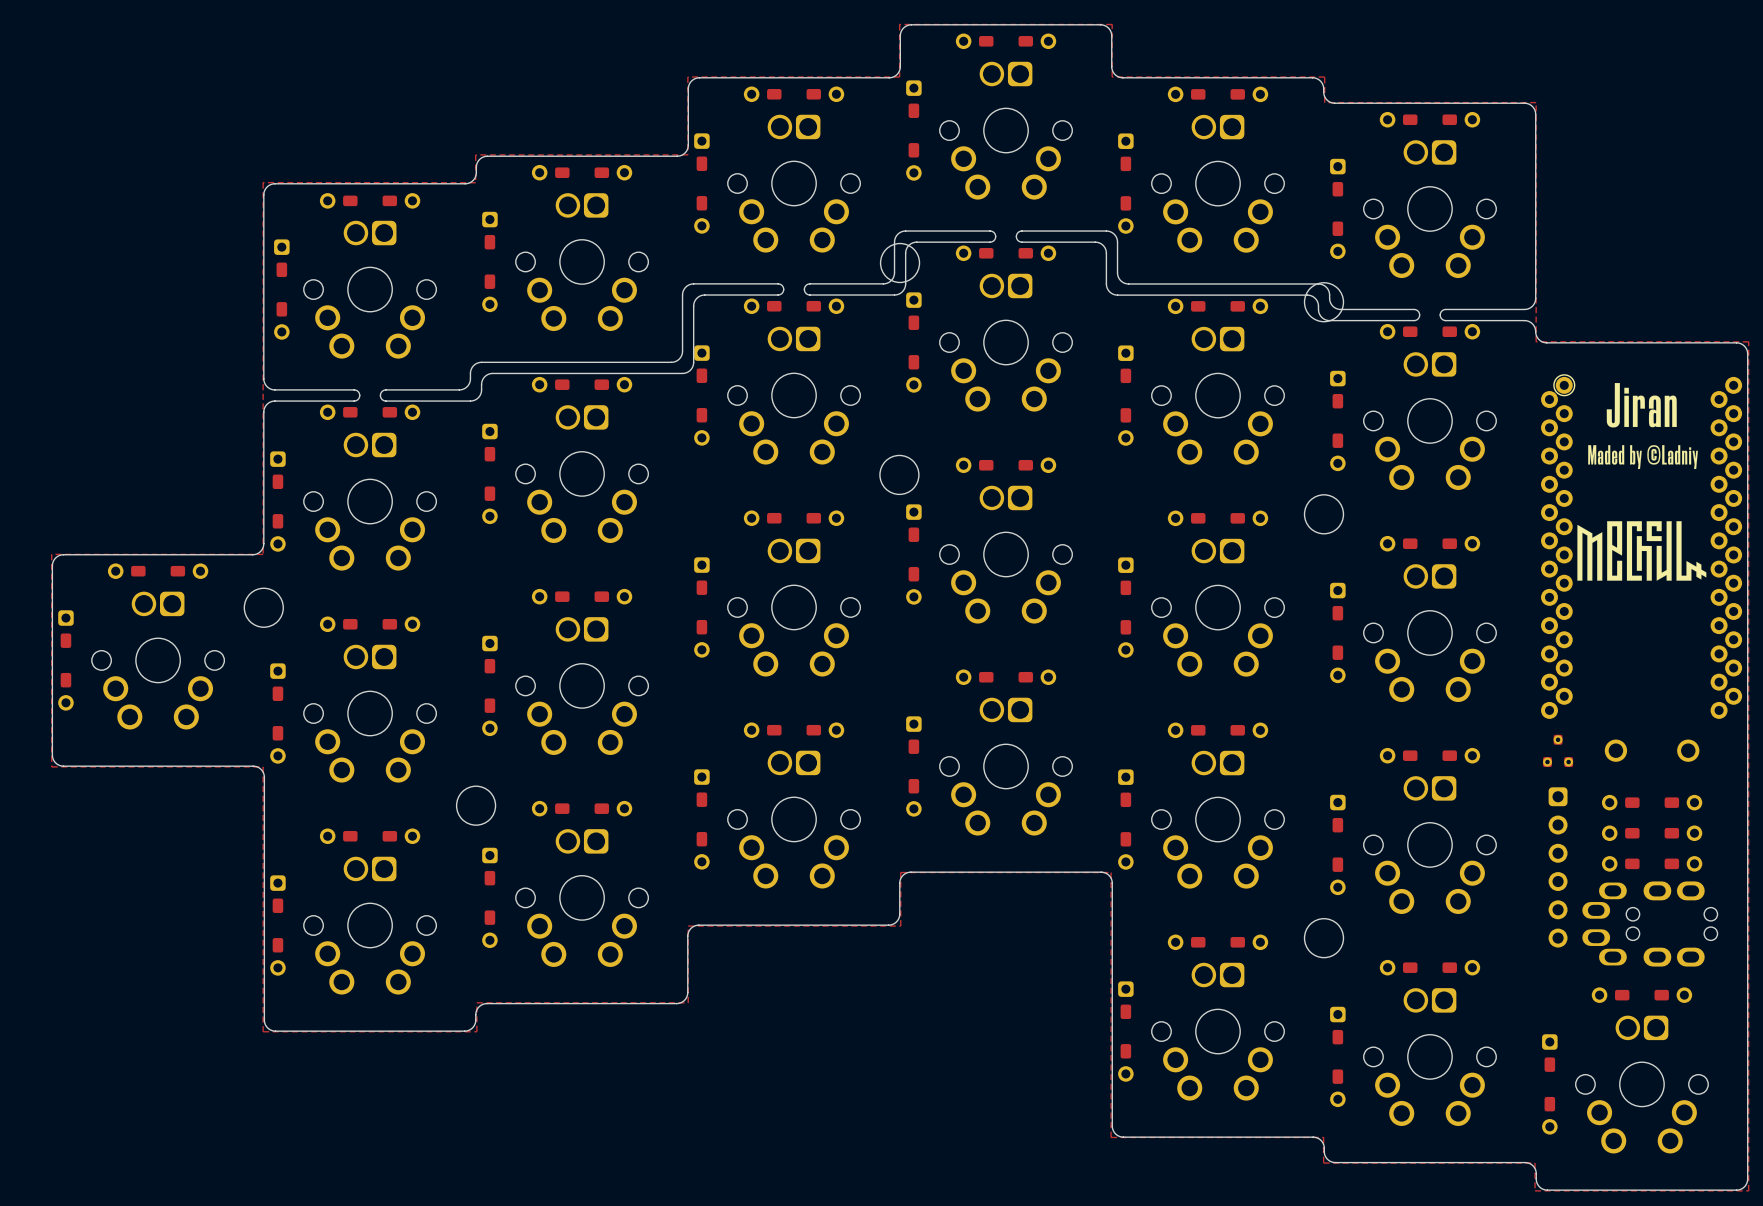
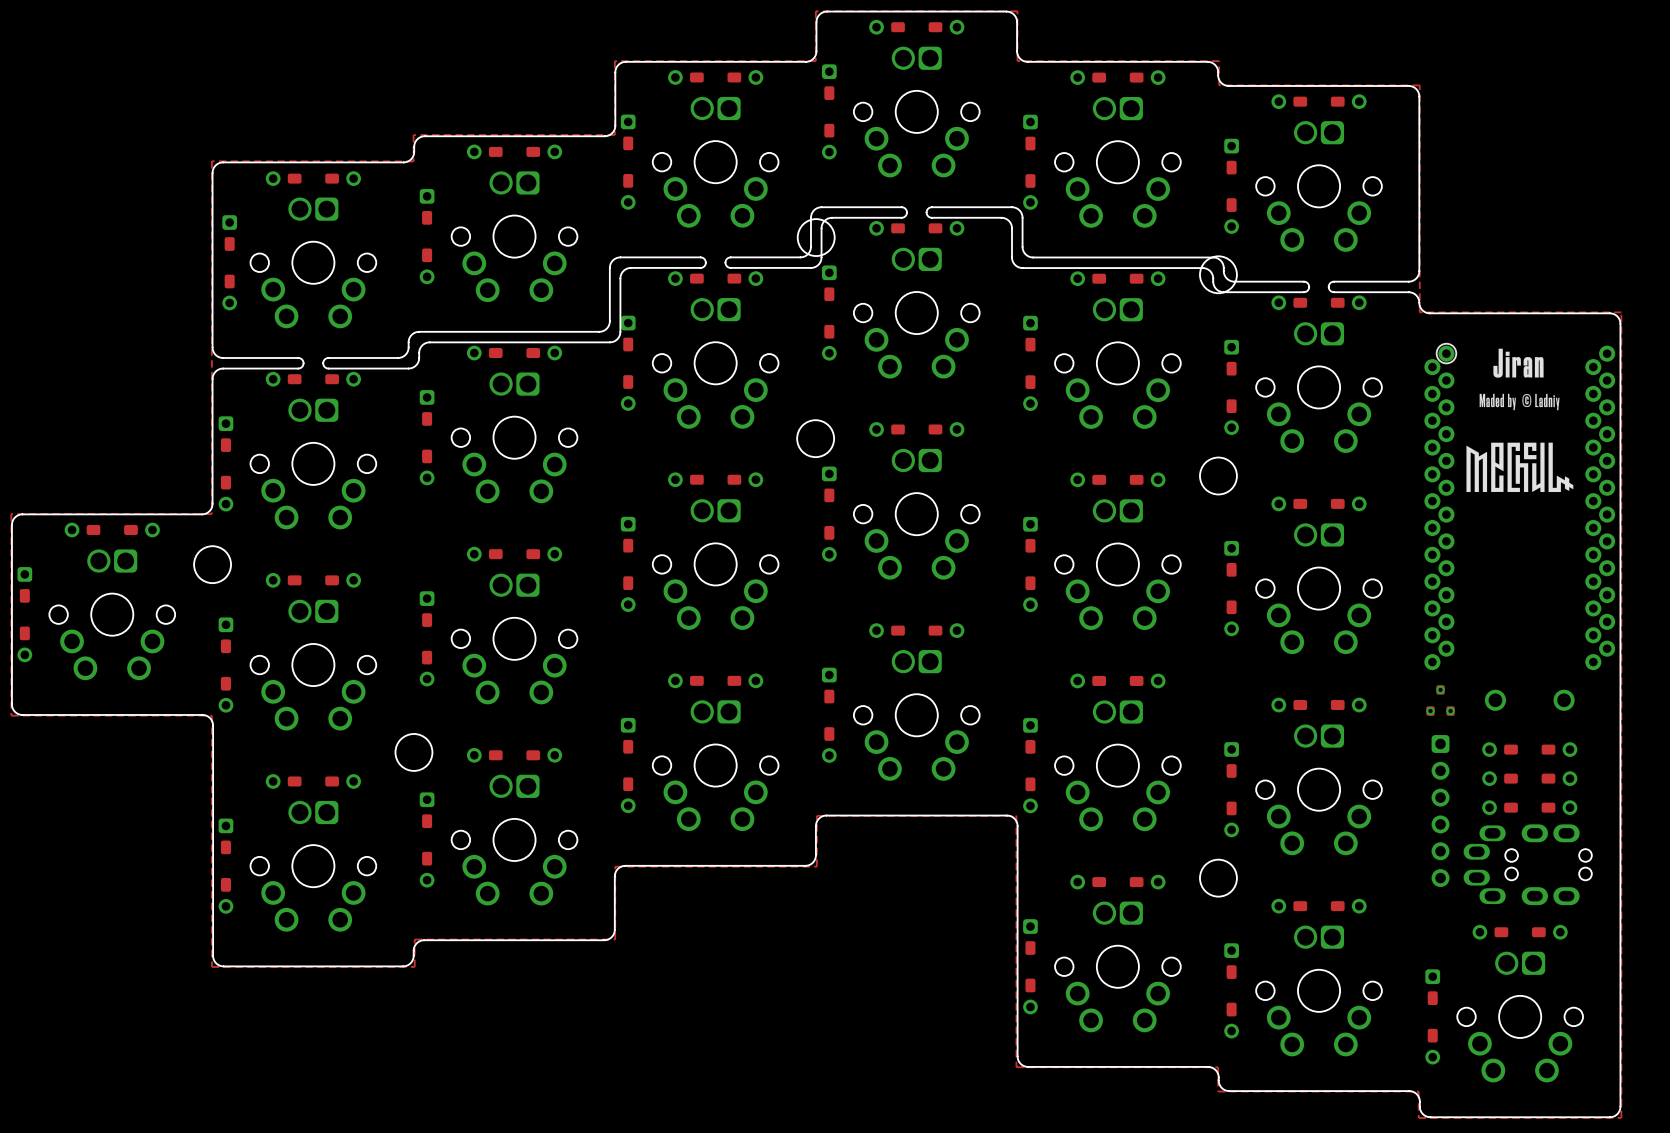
drawing: none -> [1466, 348, 1574, 493]
drawing: [1577, 383, 1707, 581] -> none

